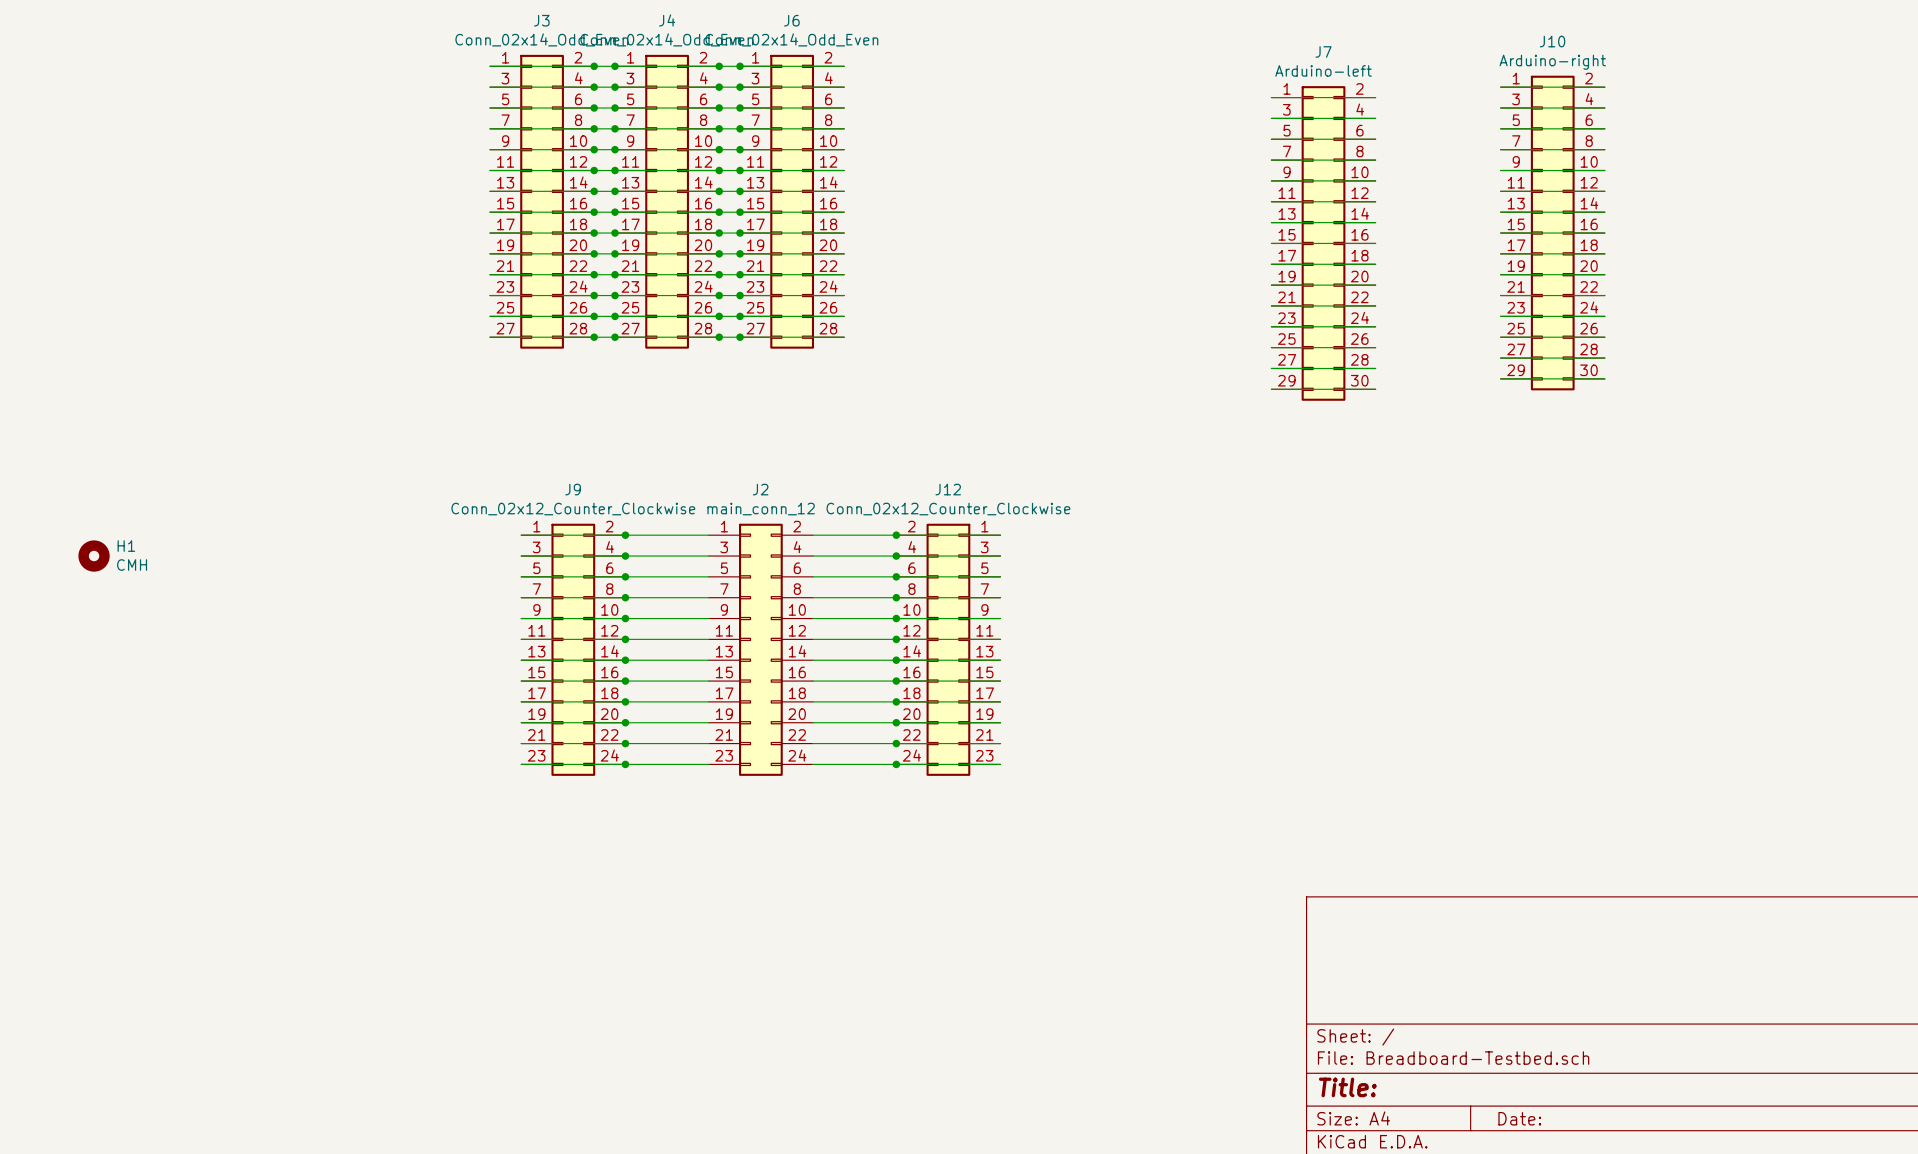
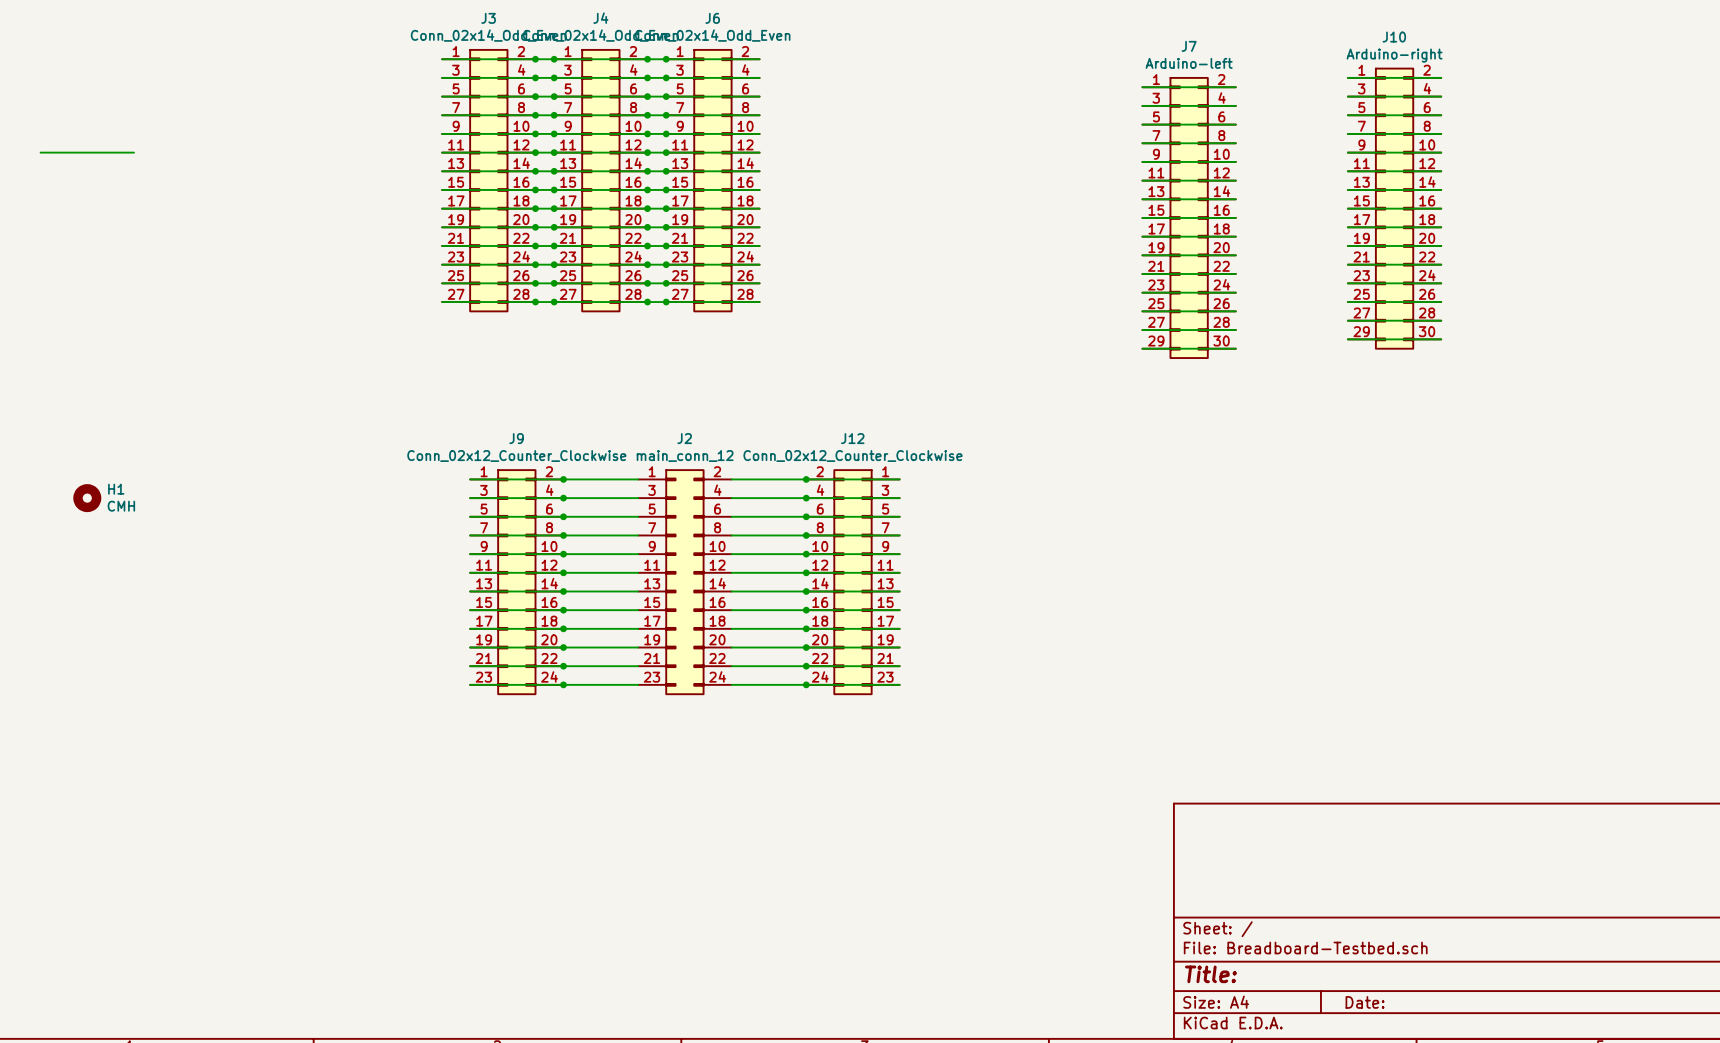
wire: none -> (40, 152) (133, 152)

